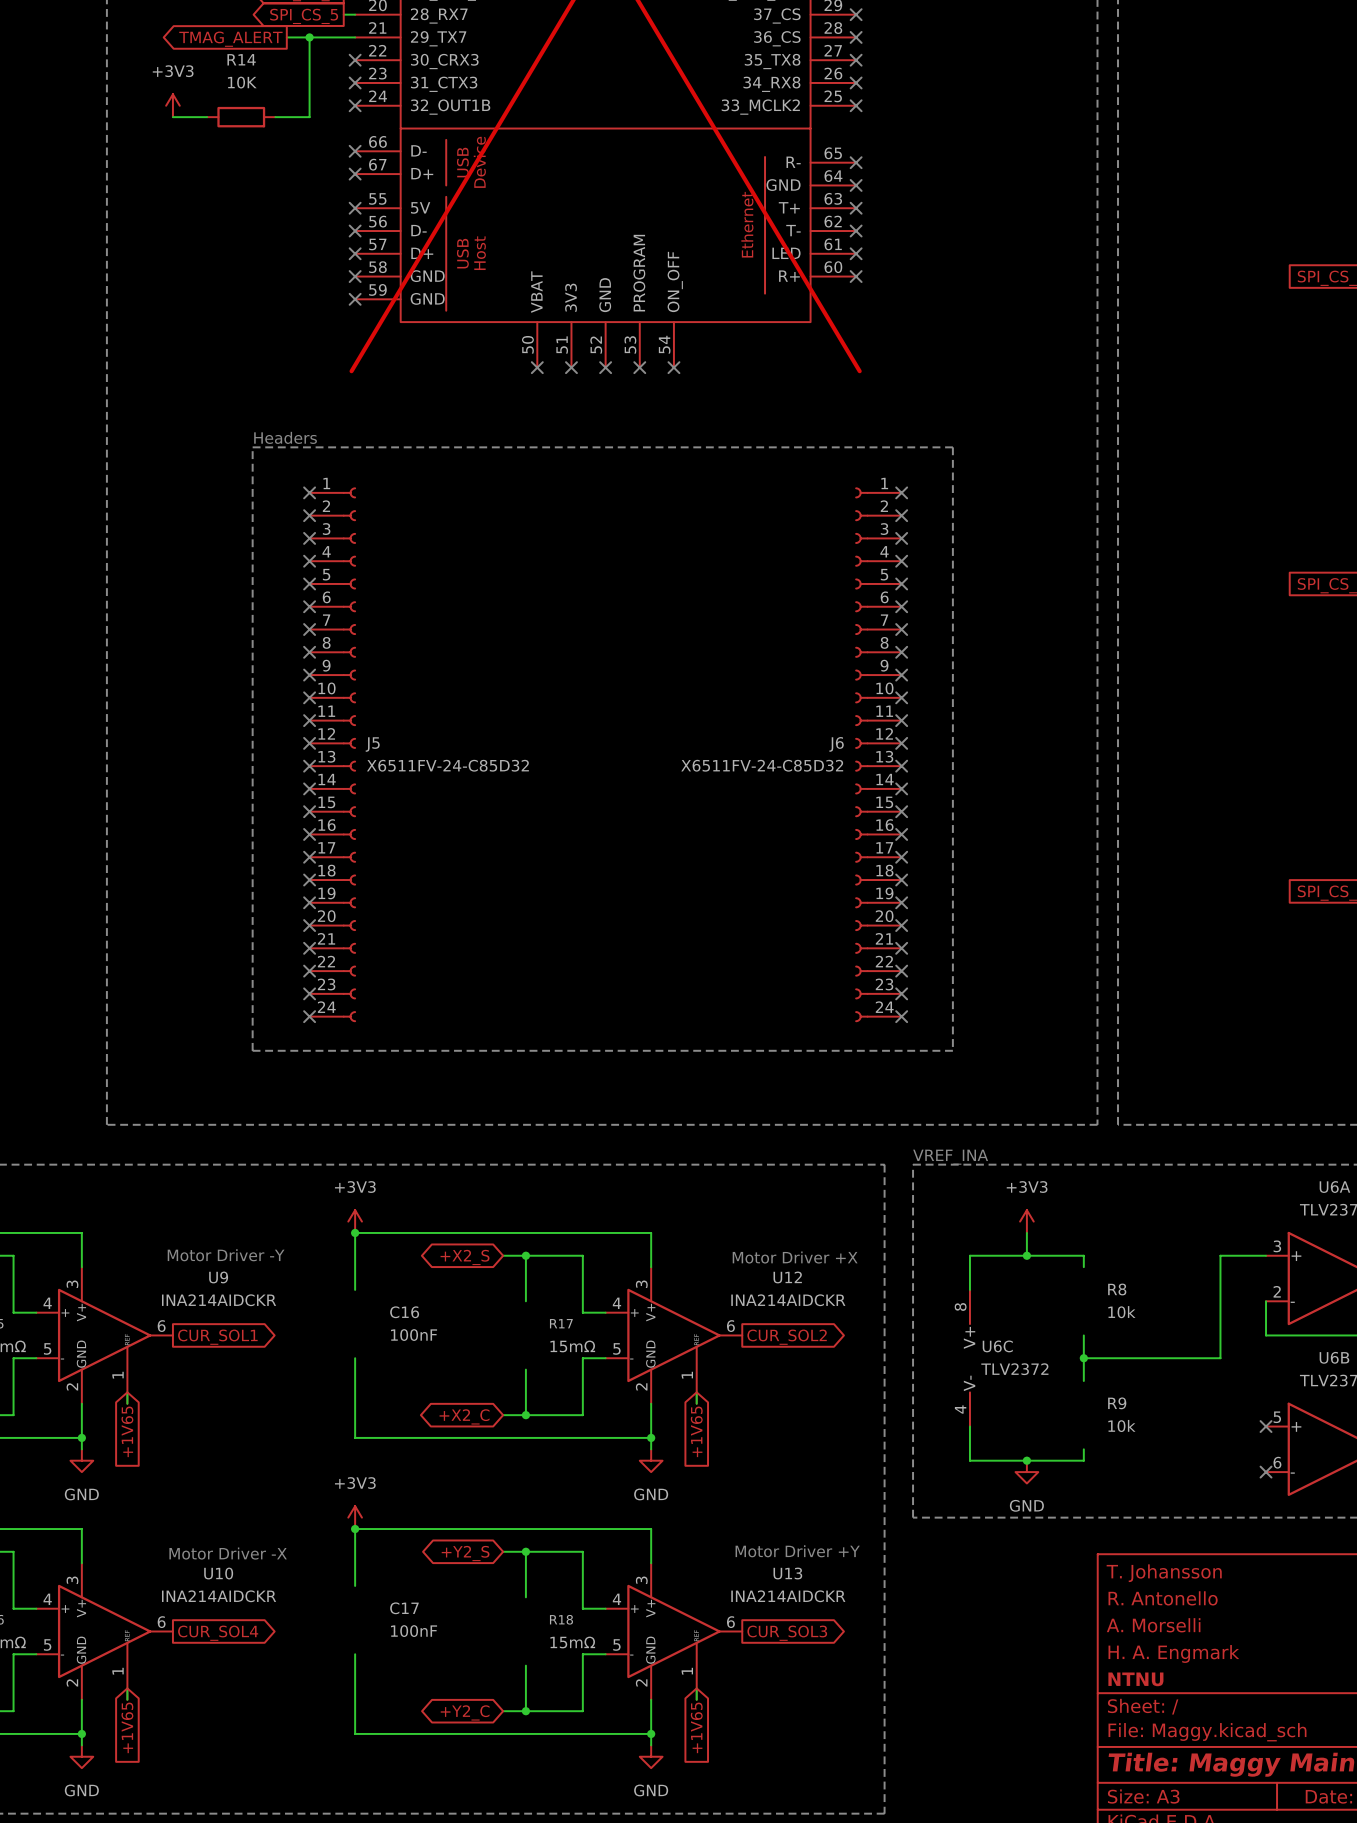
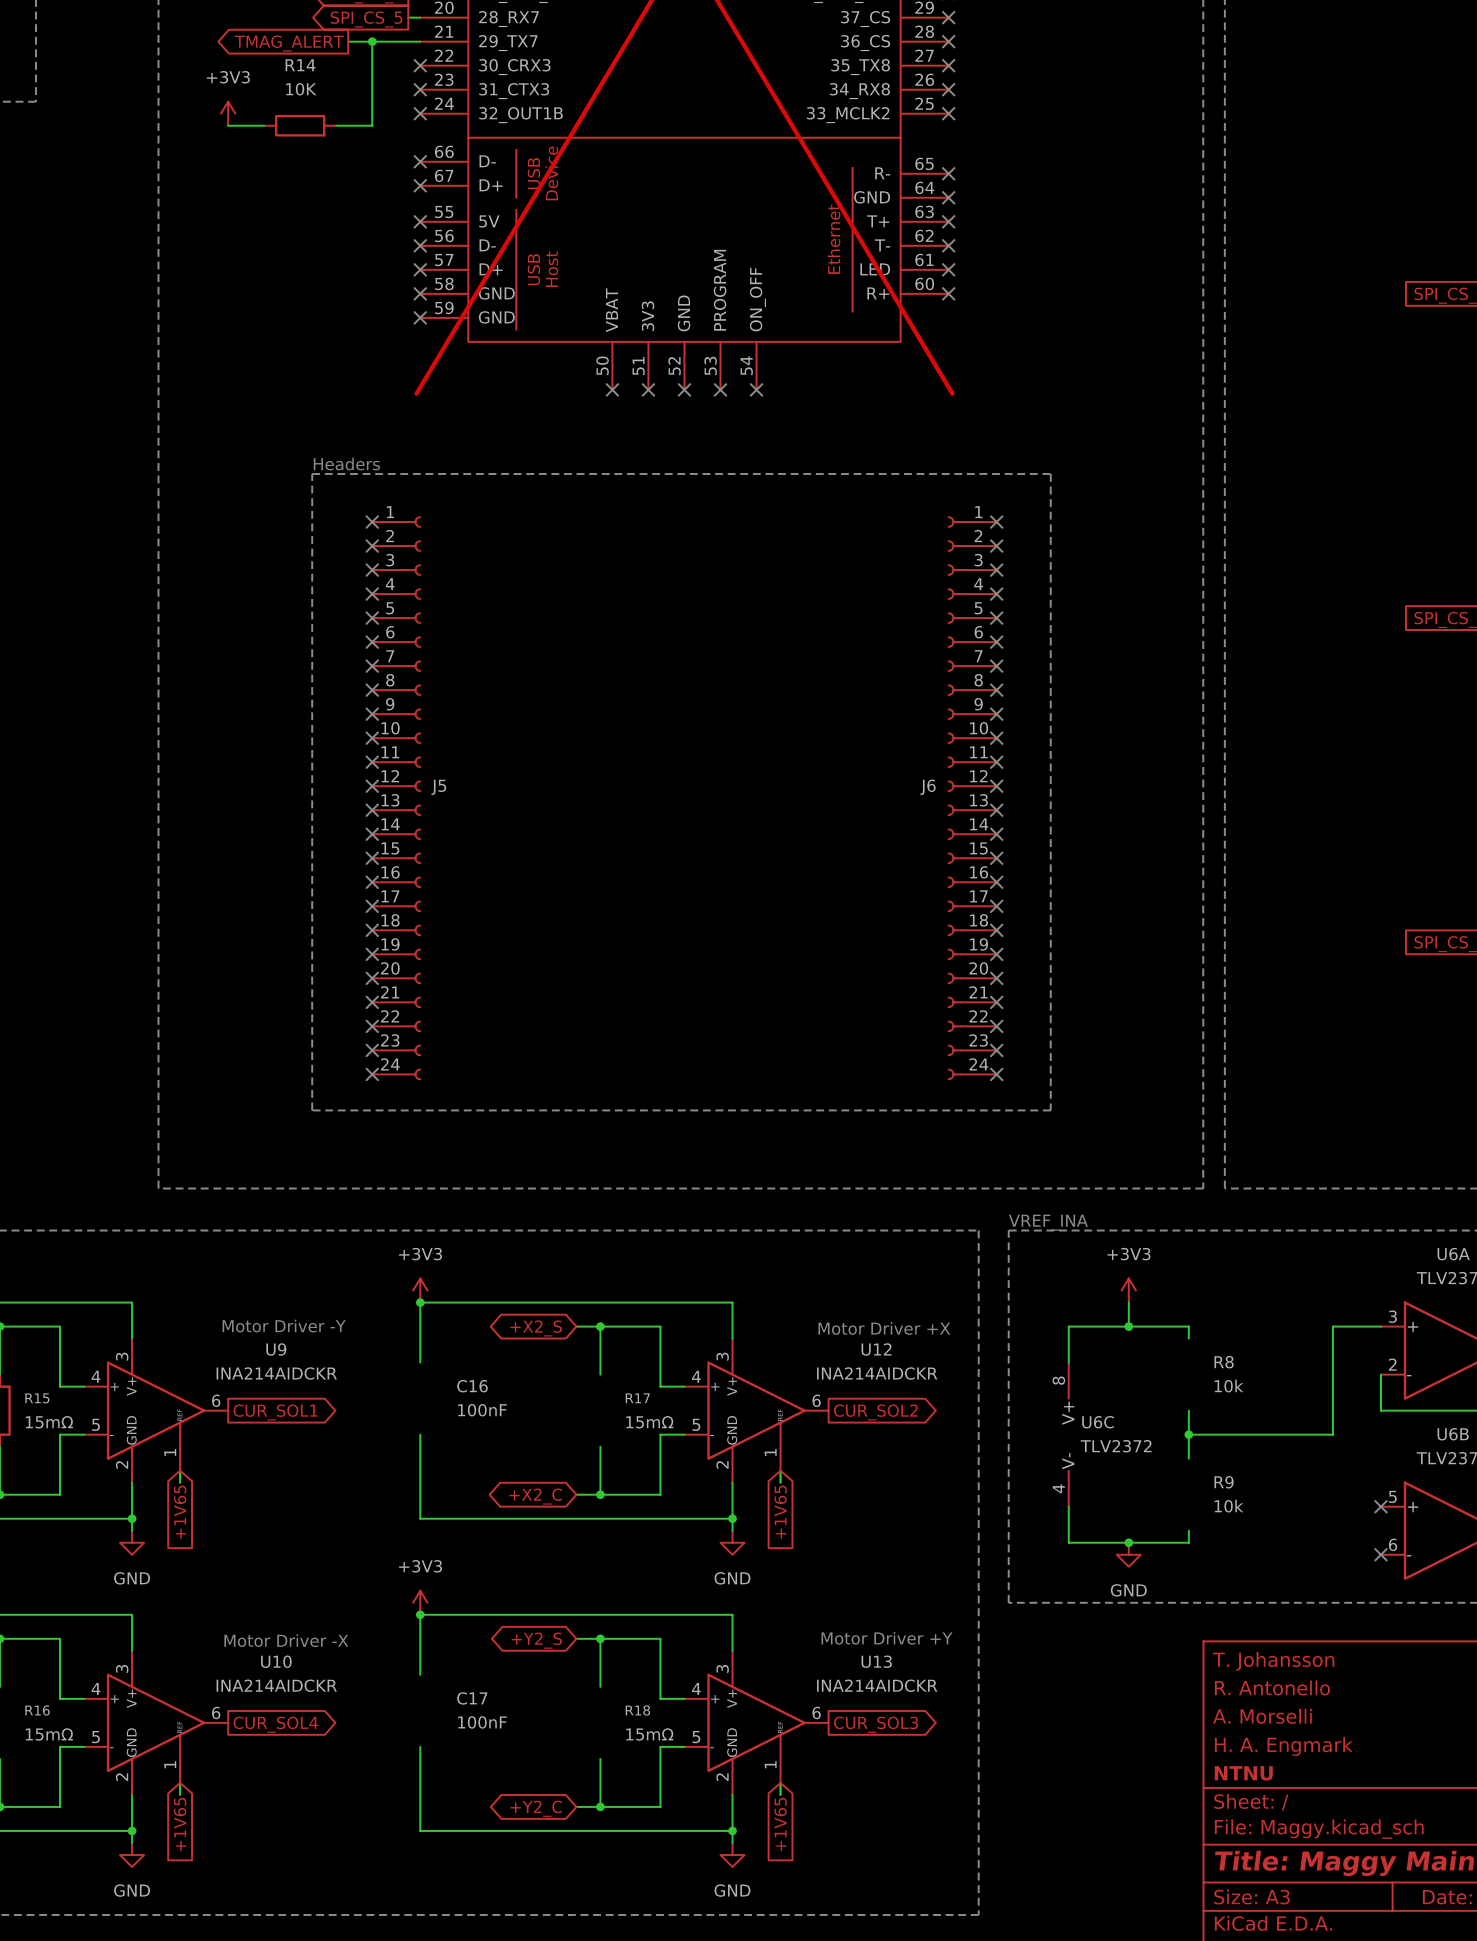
J5 value: X6511FV-24-C85D32 (447, 765) -> none
J6 value: X6511FV-24-C85D32 (762, 765) -> none

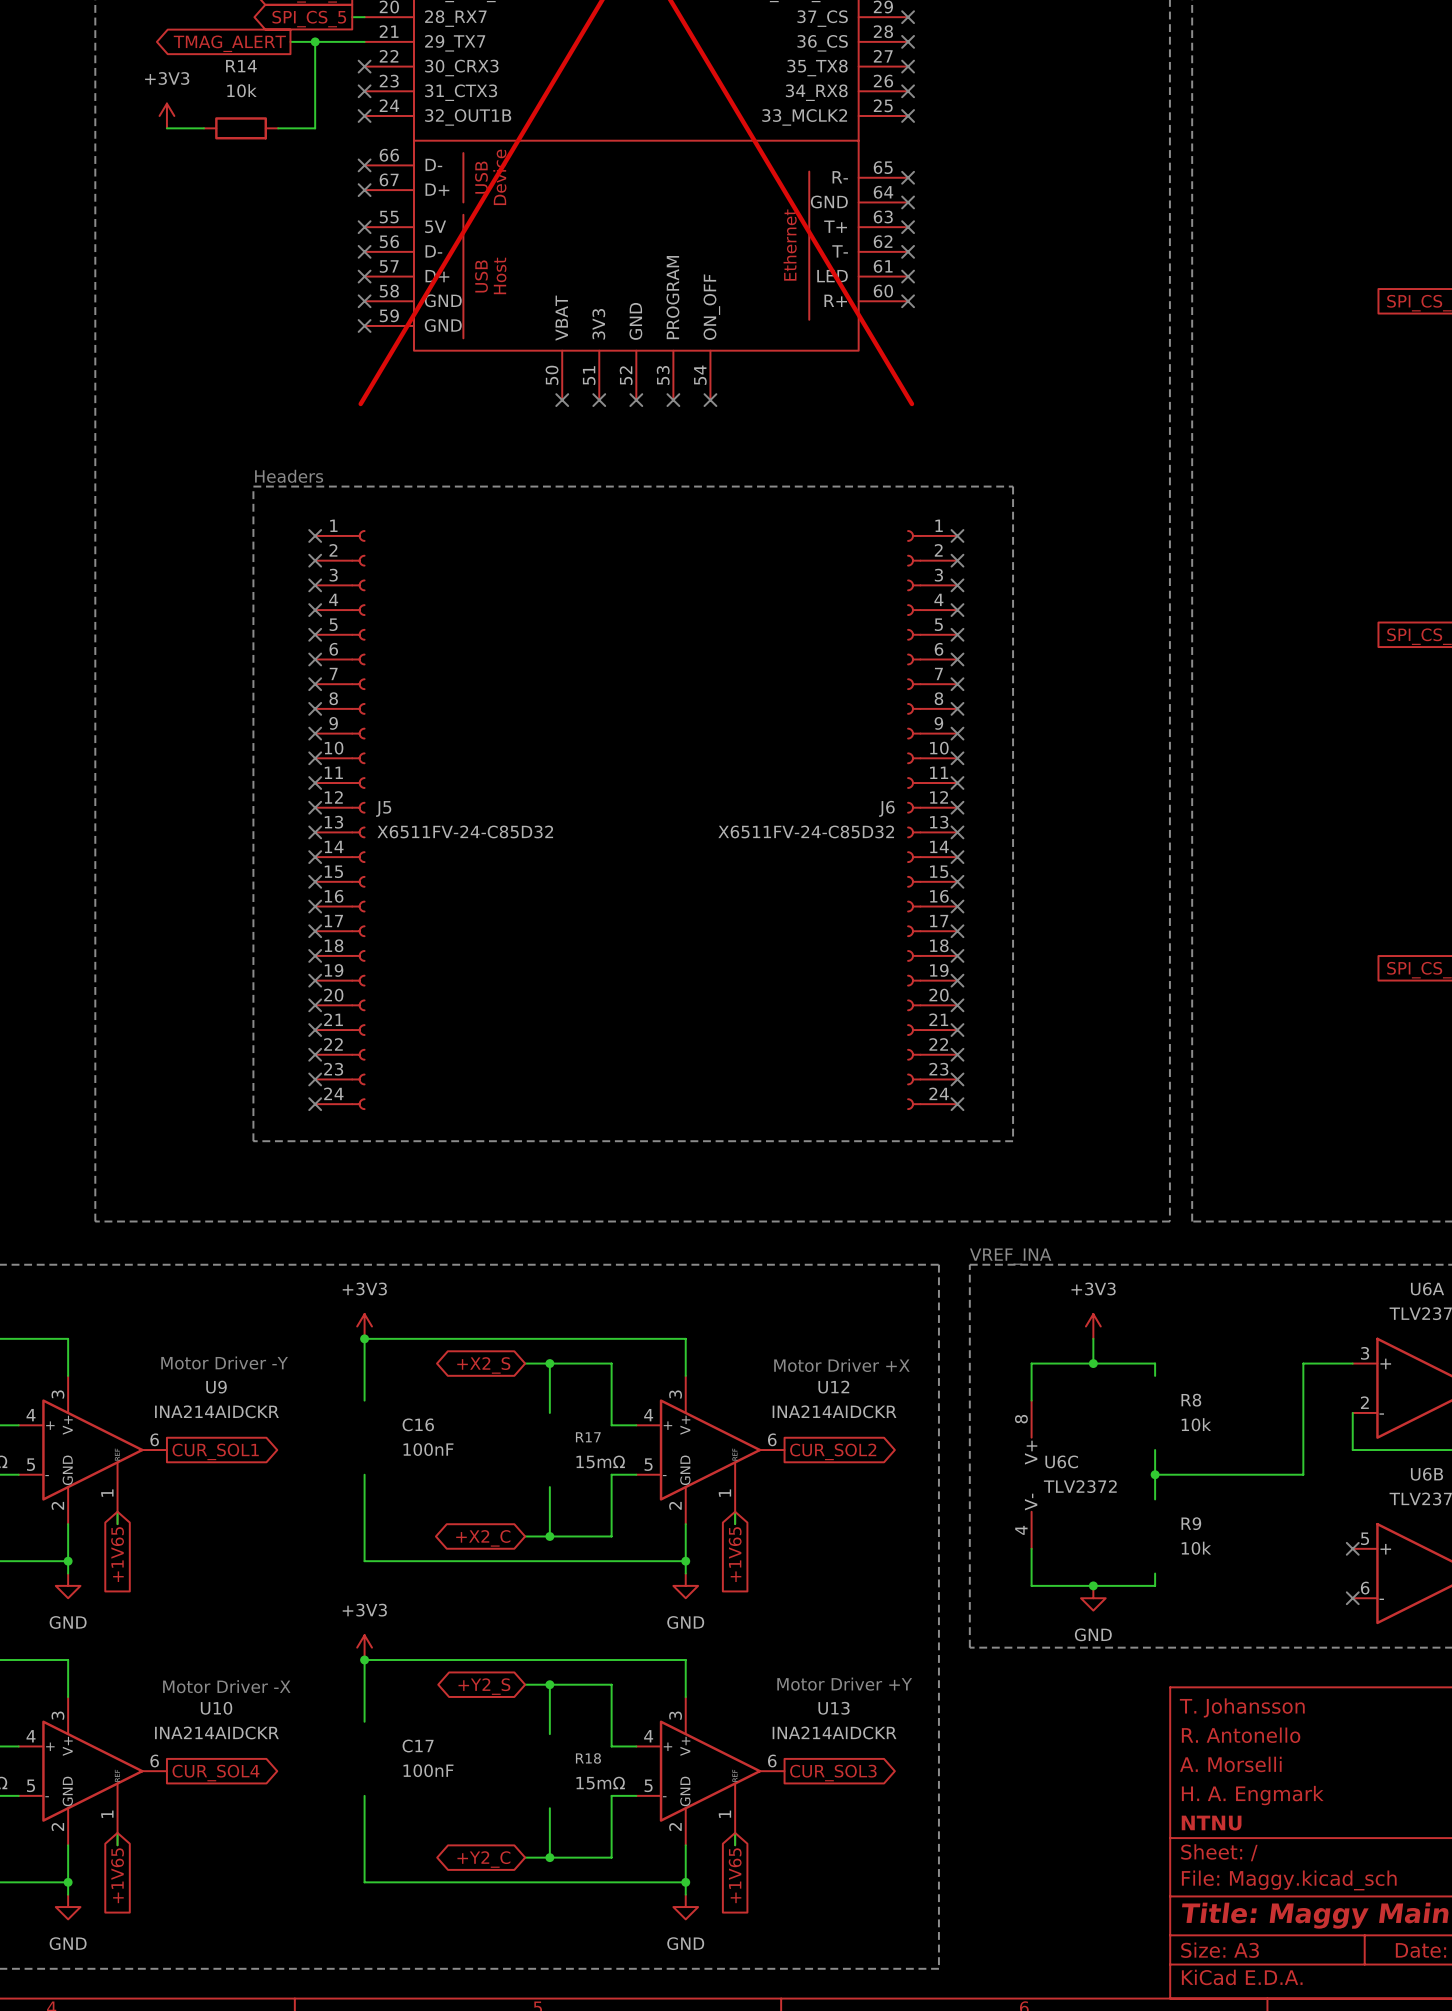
R14 value: 10K (301, 89) -> 10k (241, 90)
J5 value: none -> X6511FV-24-C85D32 (465, 831)
J6 value: none -> X6511FV-24-C85D32 (806, 831)

